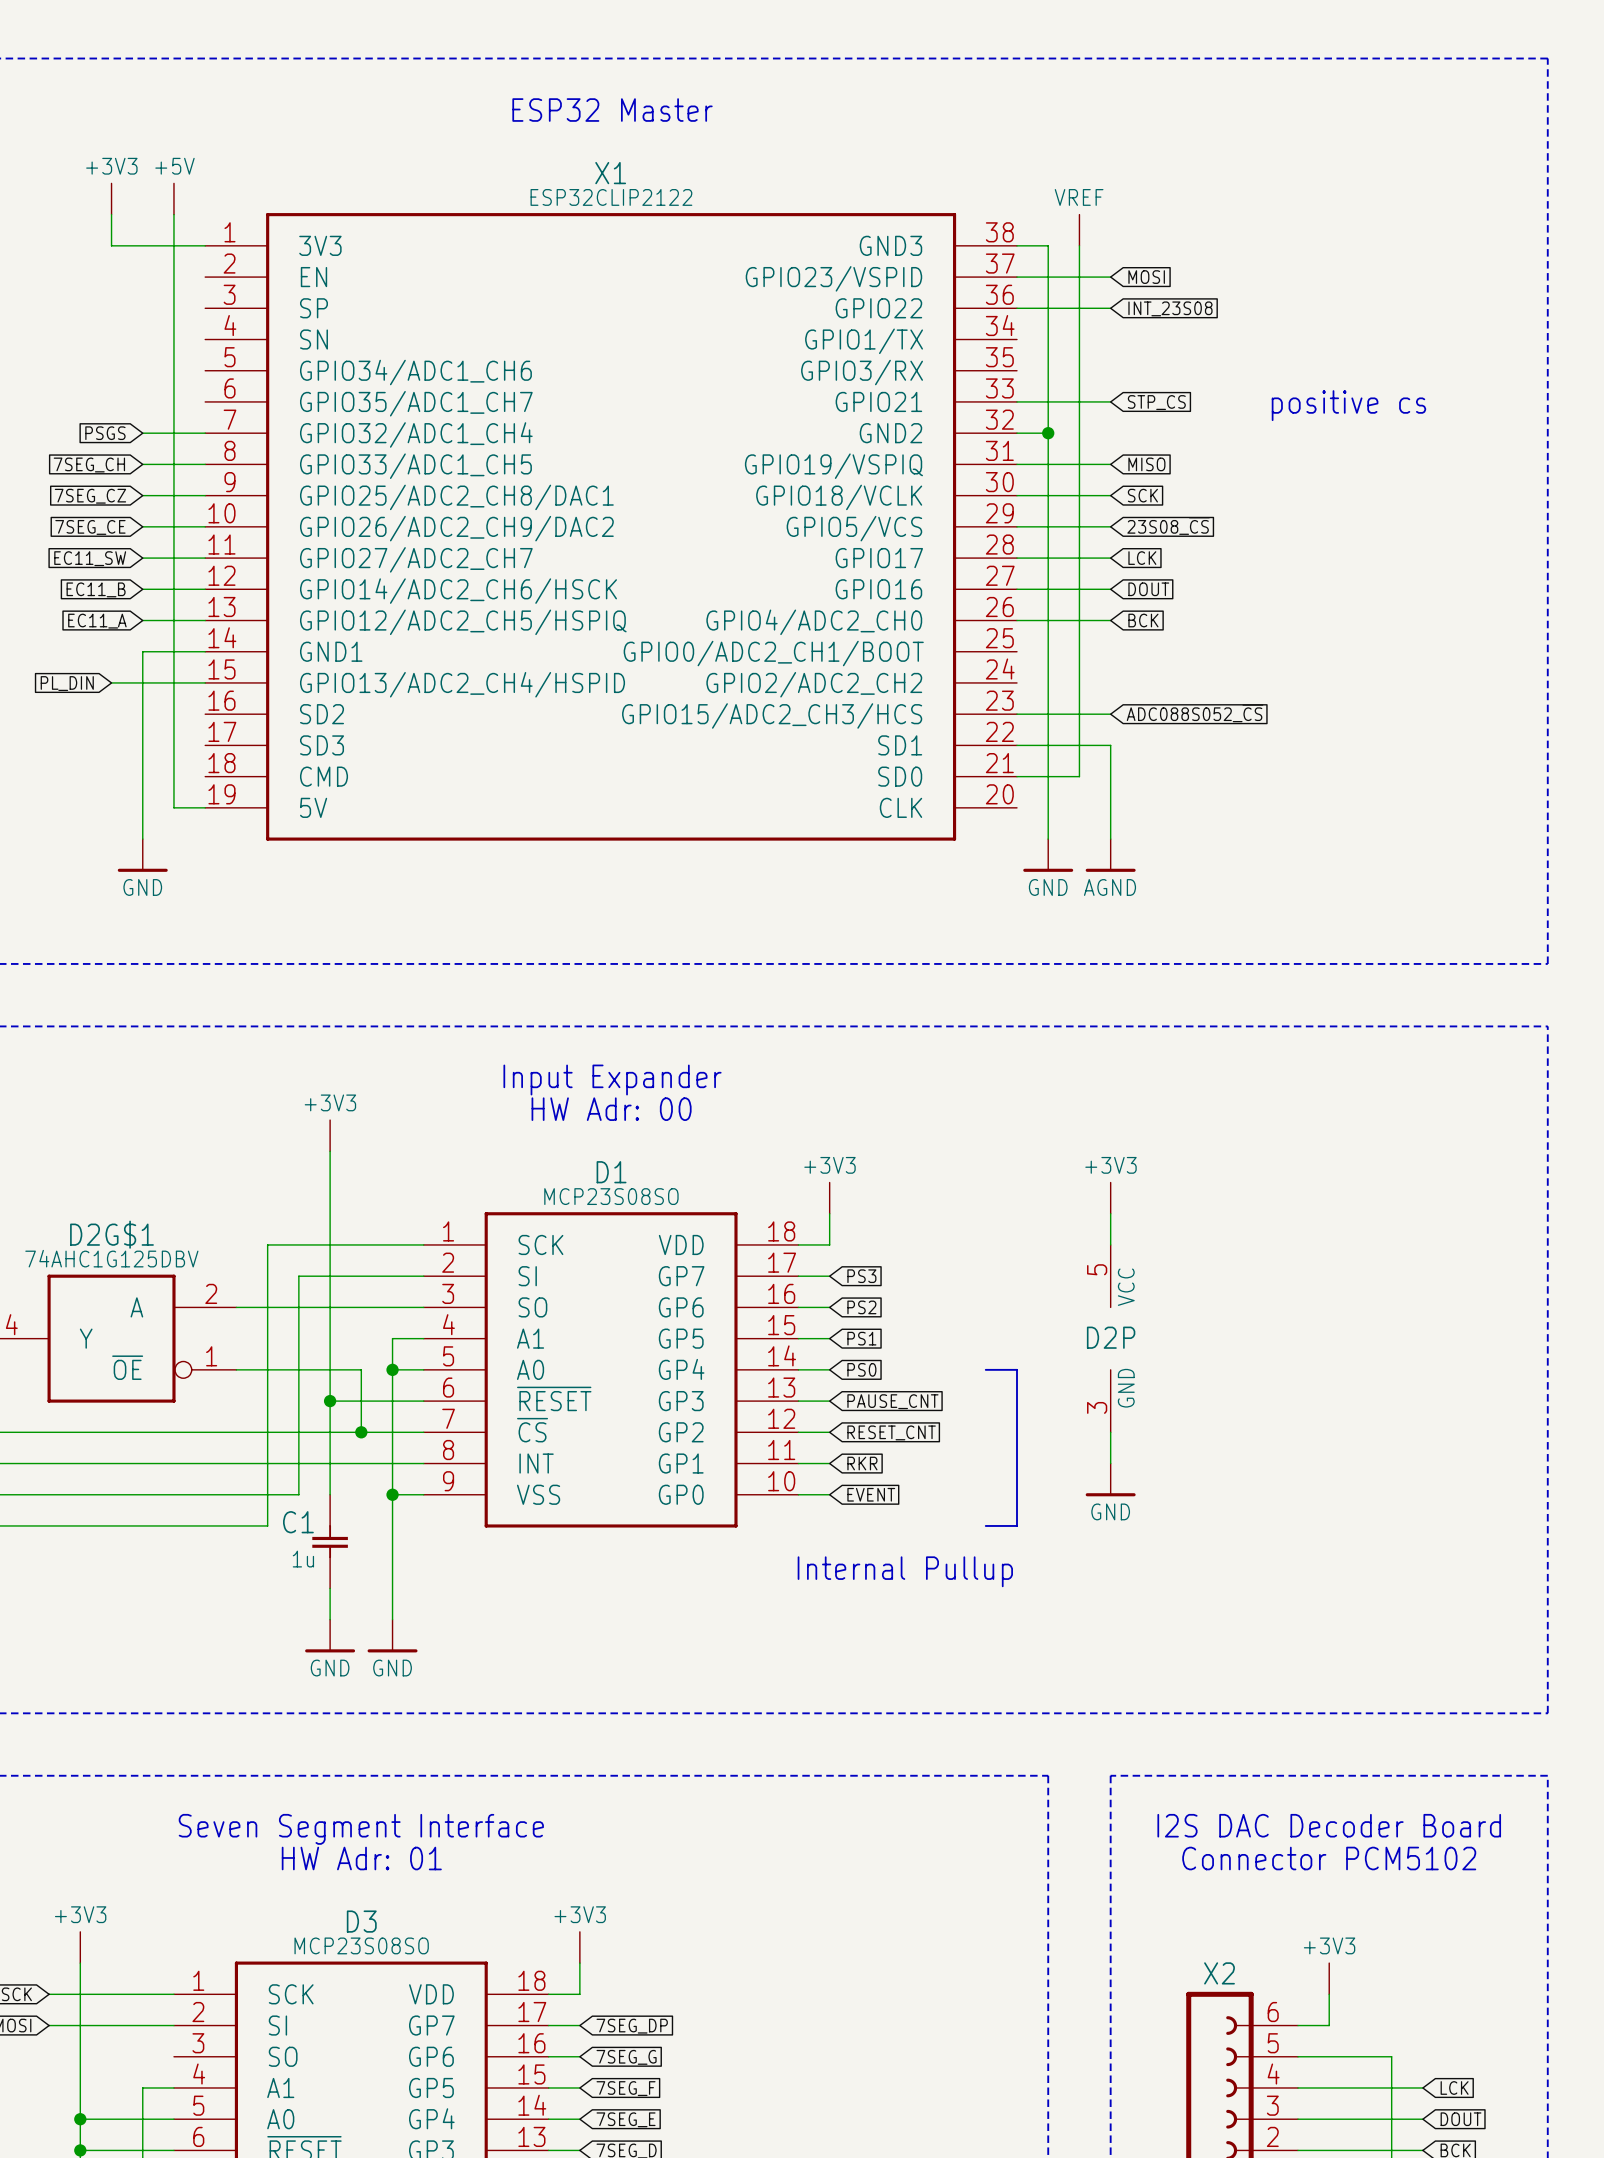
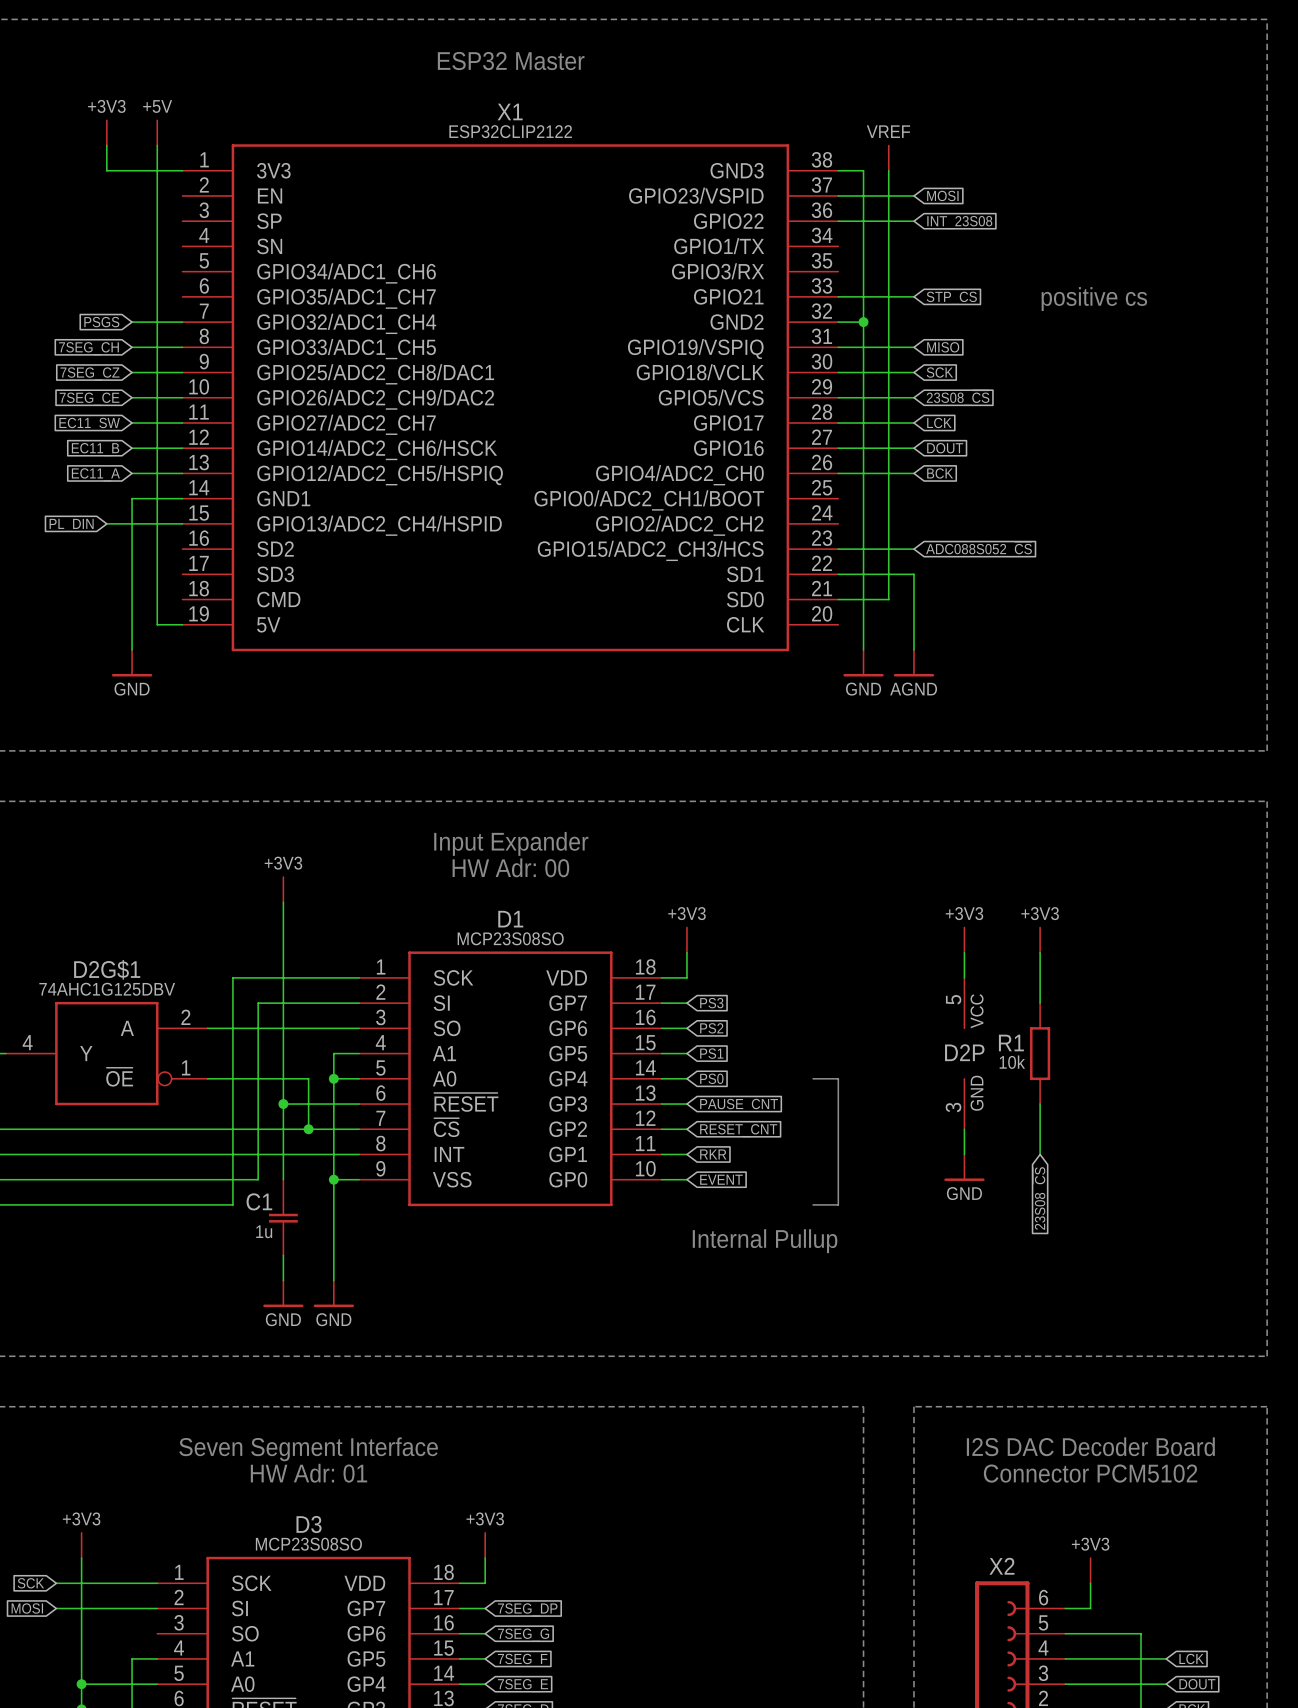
power symbol position: +3V3 (1110, 1198) -> +3V3 (964, 940)
power symbol: none -> +3V3 (1040, 940)
wire: (1110, 1213) (1110, 1244) -> (964, 952) (964, 977)
wire: none -> (1040, 952) (1040, 1003)
D2P position: (1110, 1338) -> (964, 1053)
R1: none -> 10k (1040, 1053)
wire: none -> (1040, 1104) (1040, 1154)
wire: (1110, 1432) (1110, 1463) -> (964, 1129) (964, 1154)
power symbol position: GND (1110, 1479) -> GND (964, 1167)
global label: none -> 23S08_~{CS} (1040, 1198)

